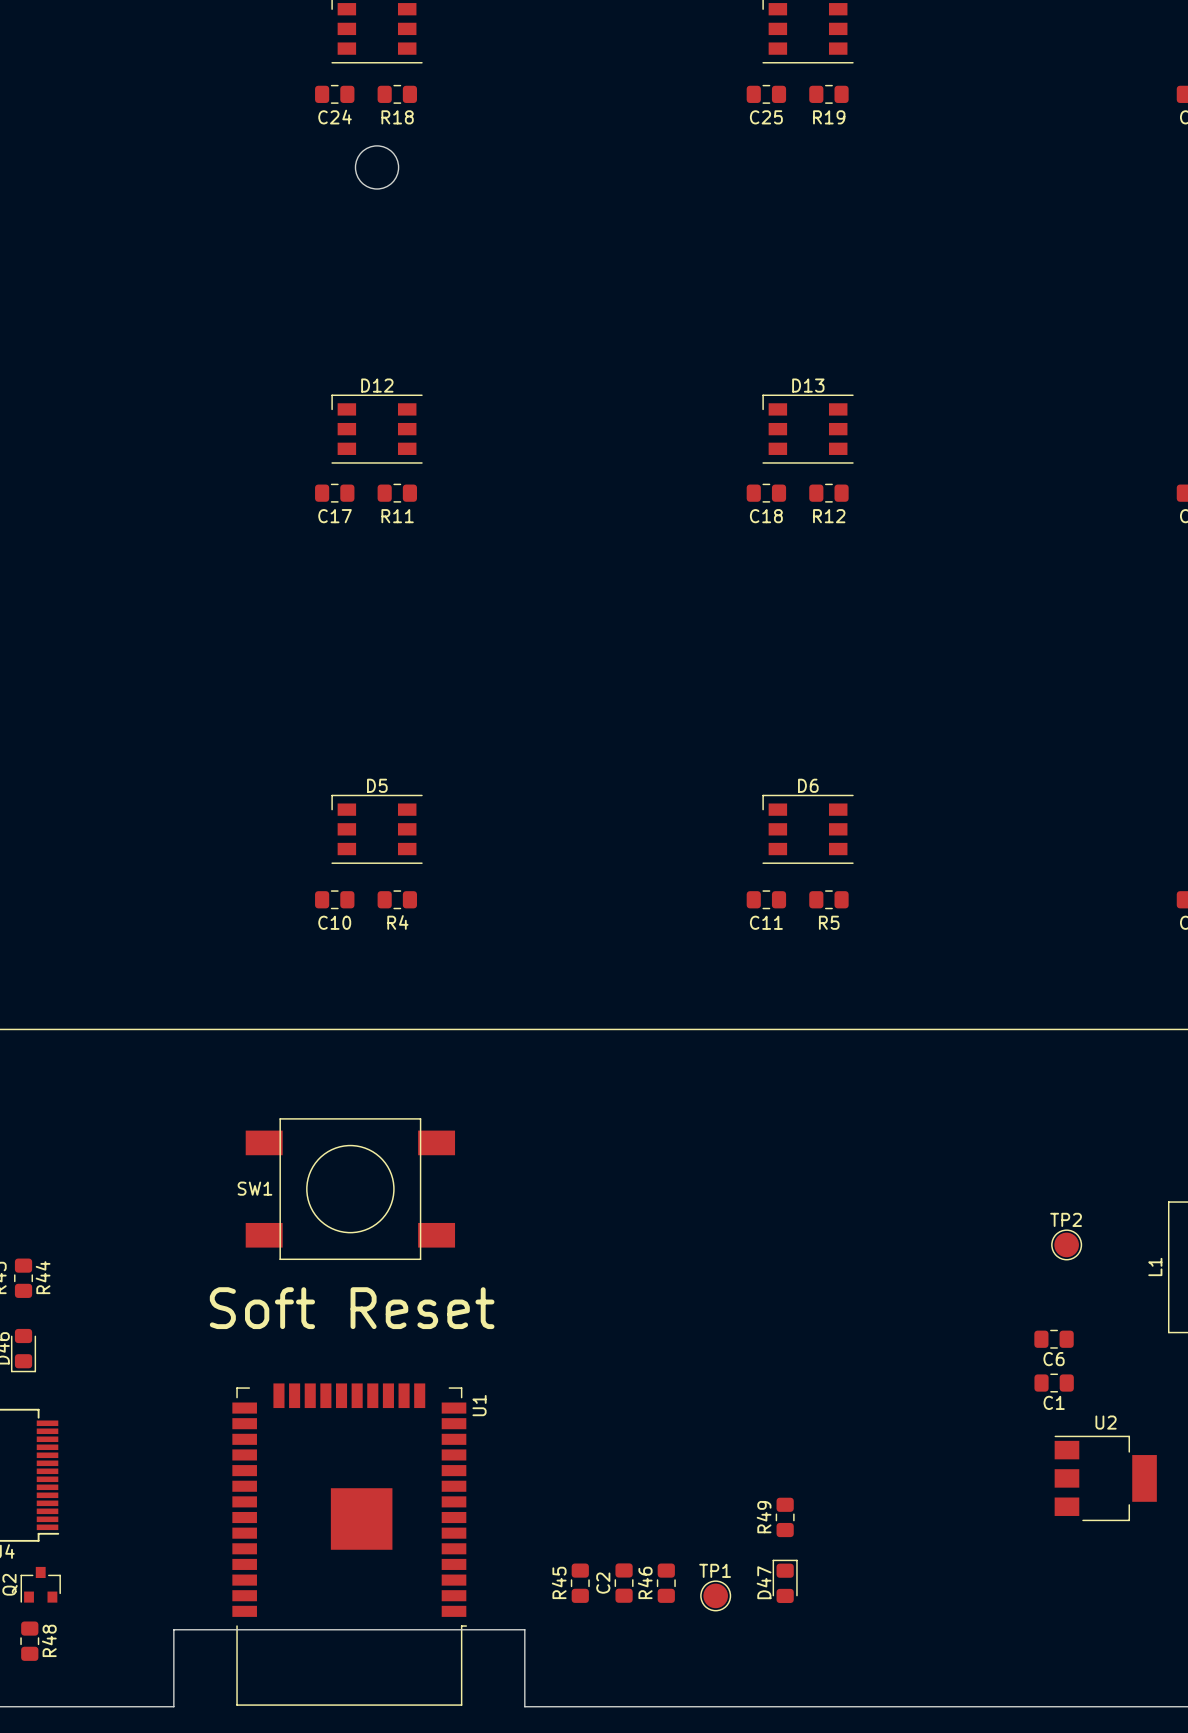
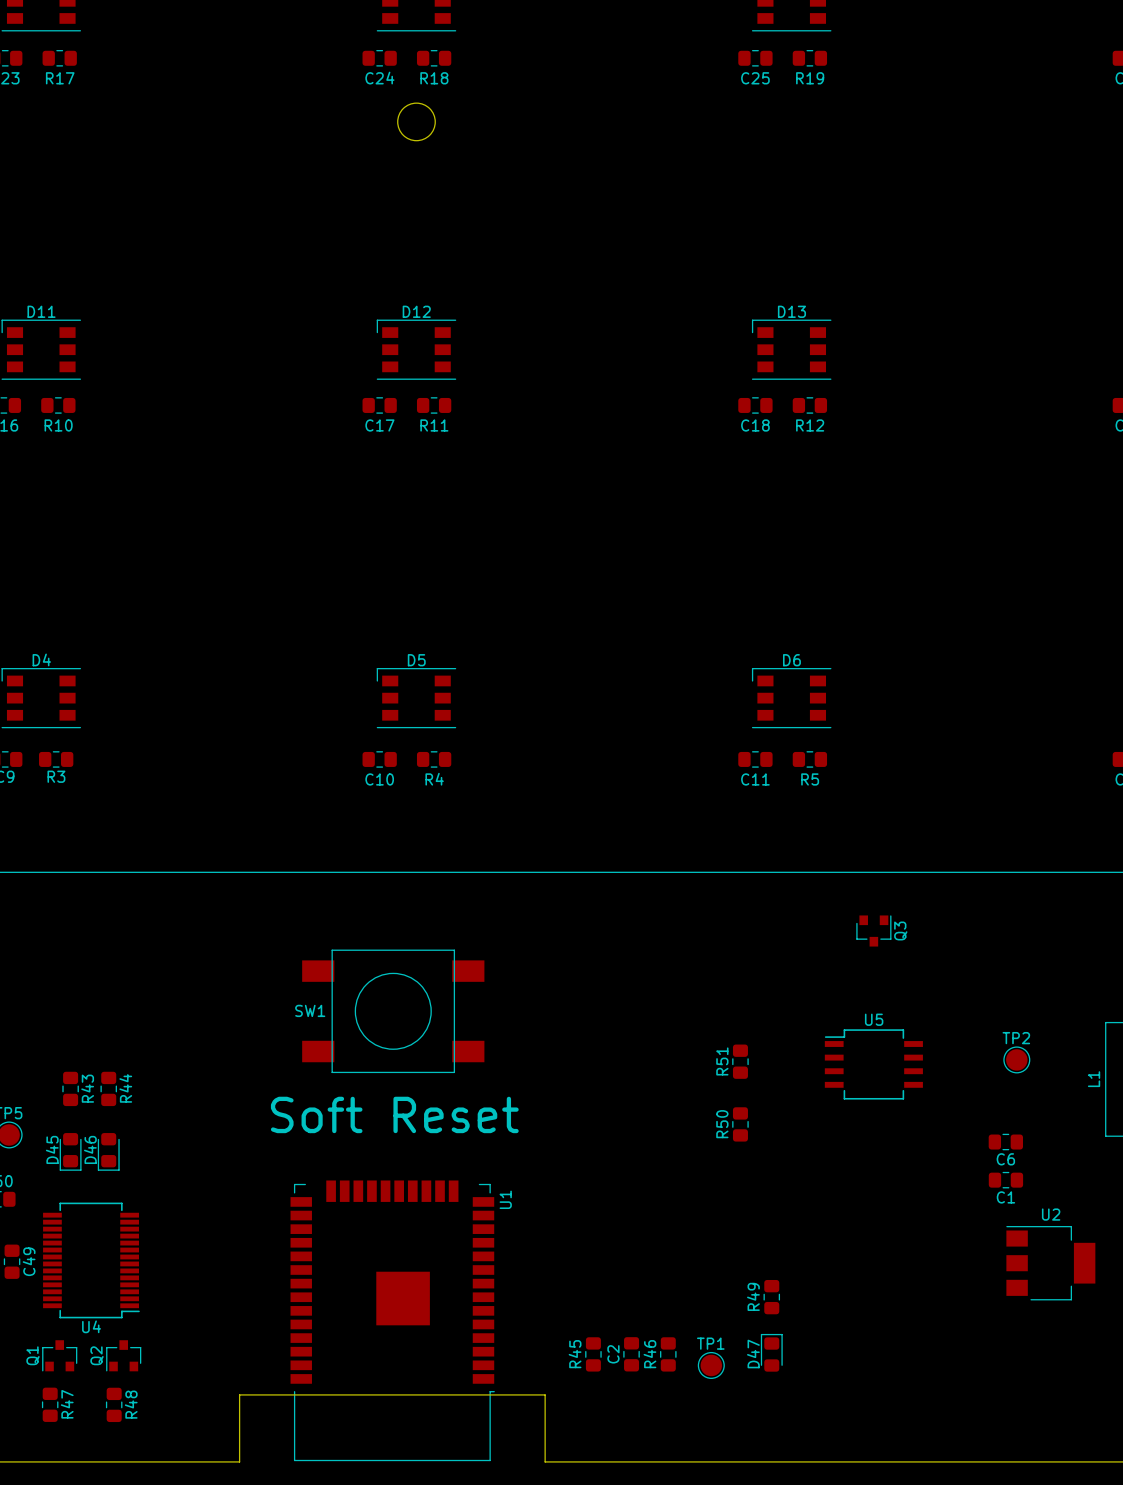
Q3: none -> (873, 930)
R51: none -> (740, 1061)
U5: none -> (873, 1064)
R50: none -> (740, 1124)

